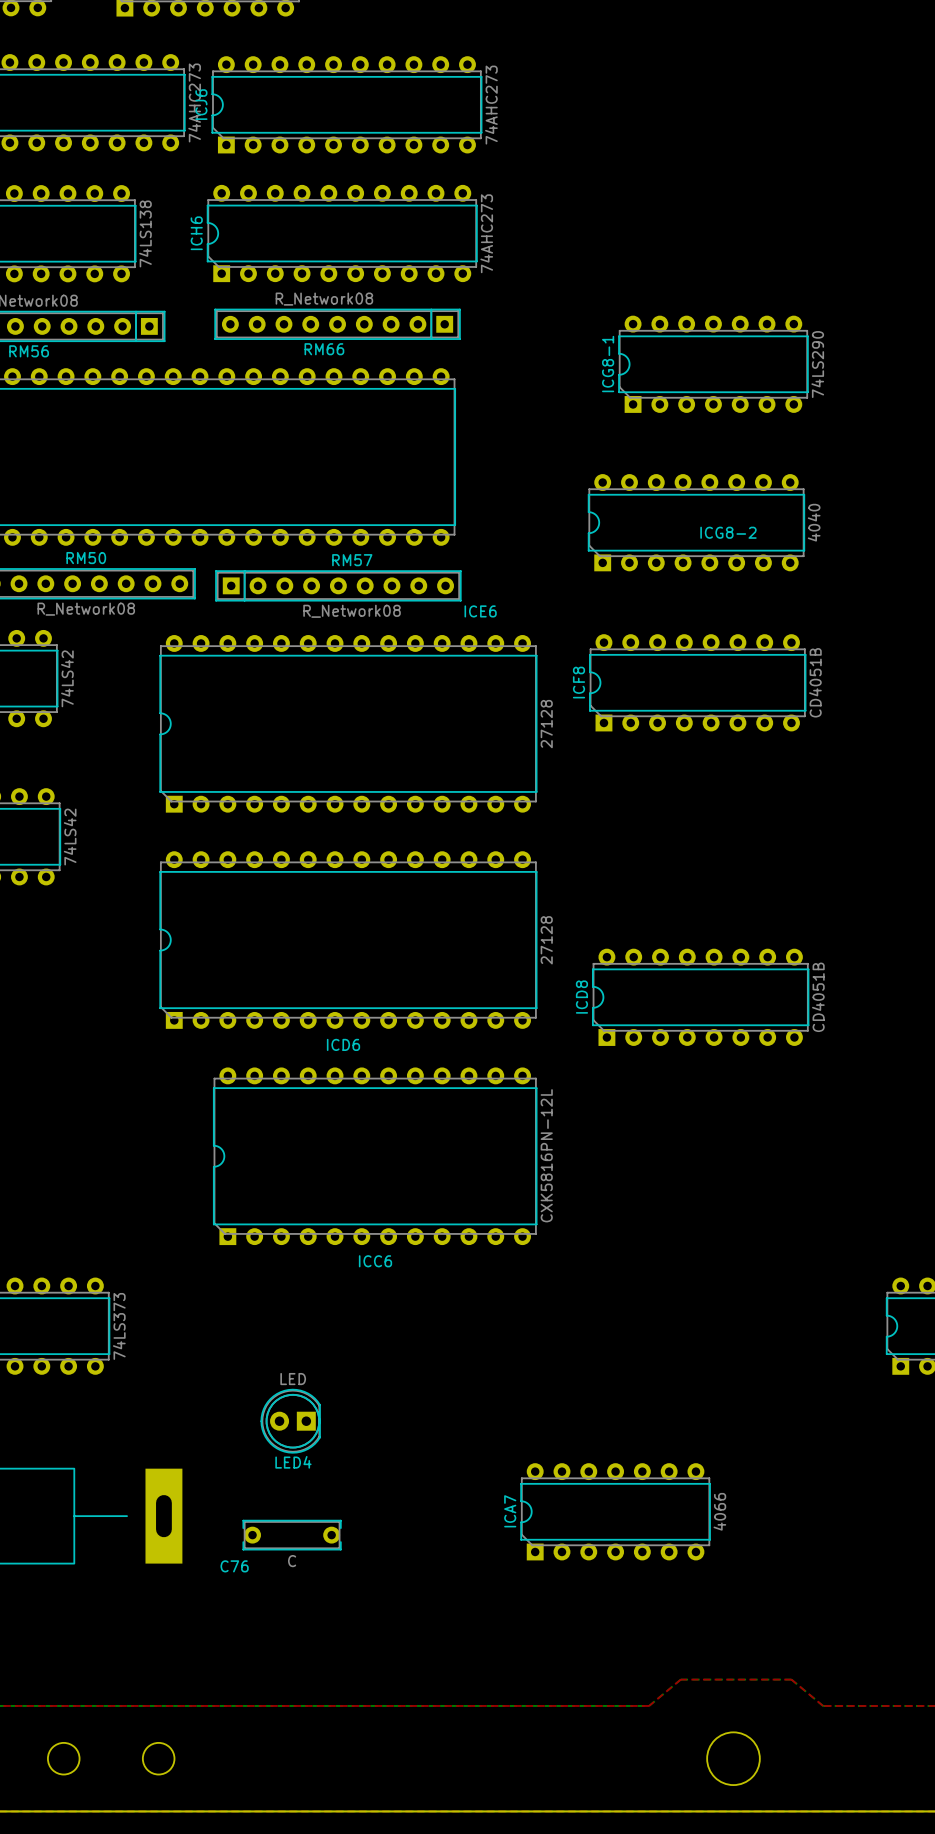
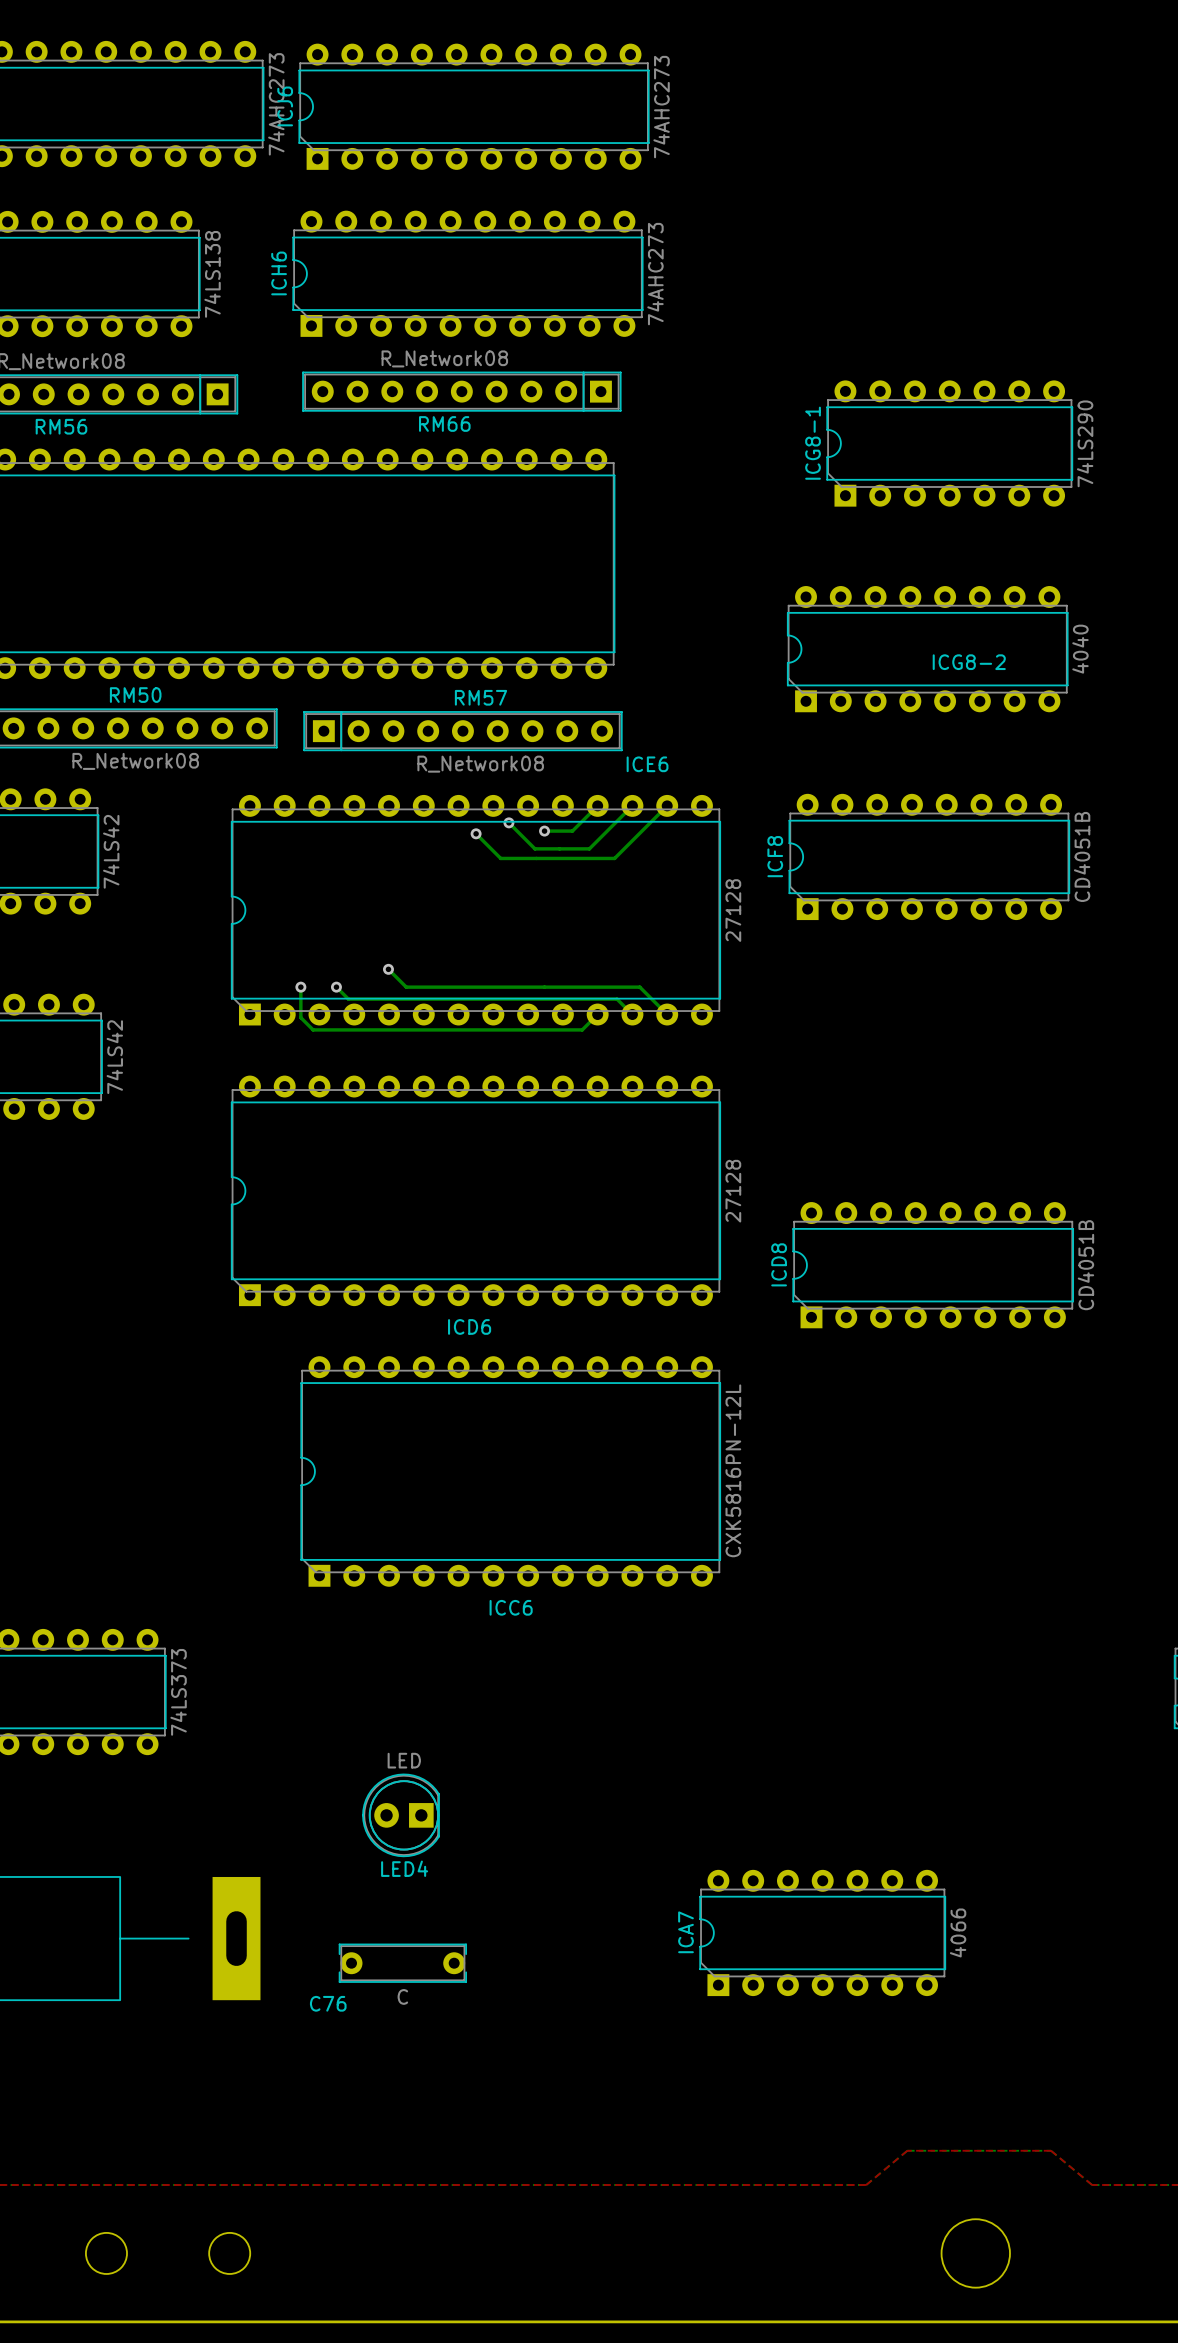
bottom track: none -> (597, 805) (572, 831) (544, 831)
bottom track: none -> (632, 805) (589, 848) (534, 848) (508, 822)
bottom track: none -> (667, 805) (614, 858) (500, 858) (476, 833)
via: none -> (508, 822)
via: none -> (544, 831)
via: none -> (476, 833)
bottom track: none -> (388, 969) (406, 987) (639, 987) (667, 1014)
via: none -> (388, 969)
bottom track: none -> (300, 987) (300, 1017) (313, 1029) (582, 1029) (597, 1014)
via: none -> (300, 987)
bottom track: none -> (336, 987) (348, 999) (617, 999) (632, 1014)
via: none -> (336, 987)

